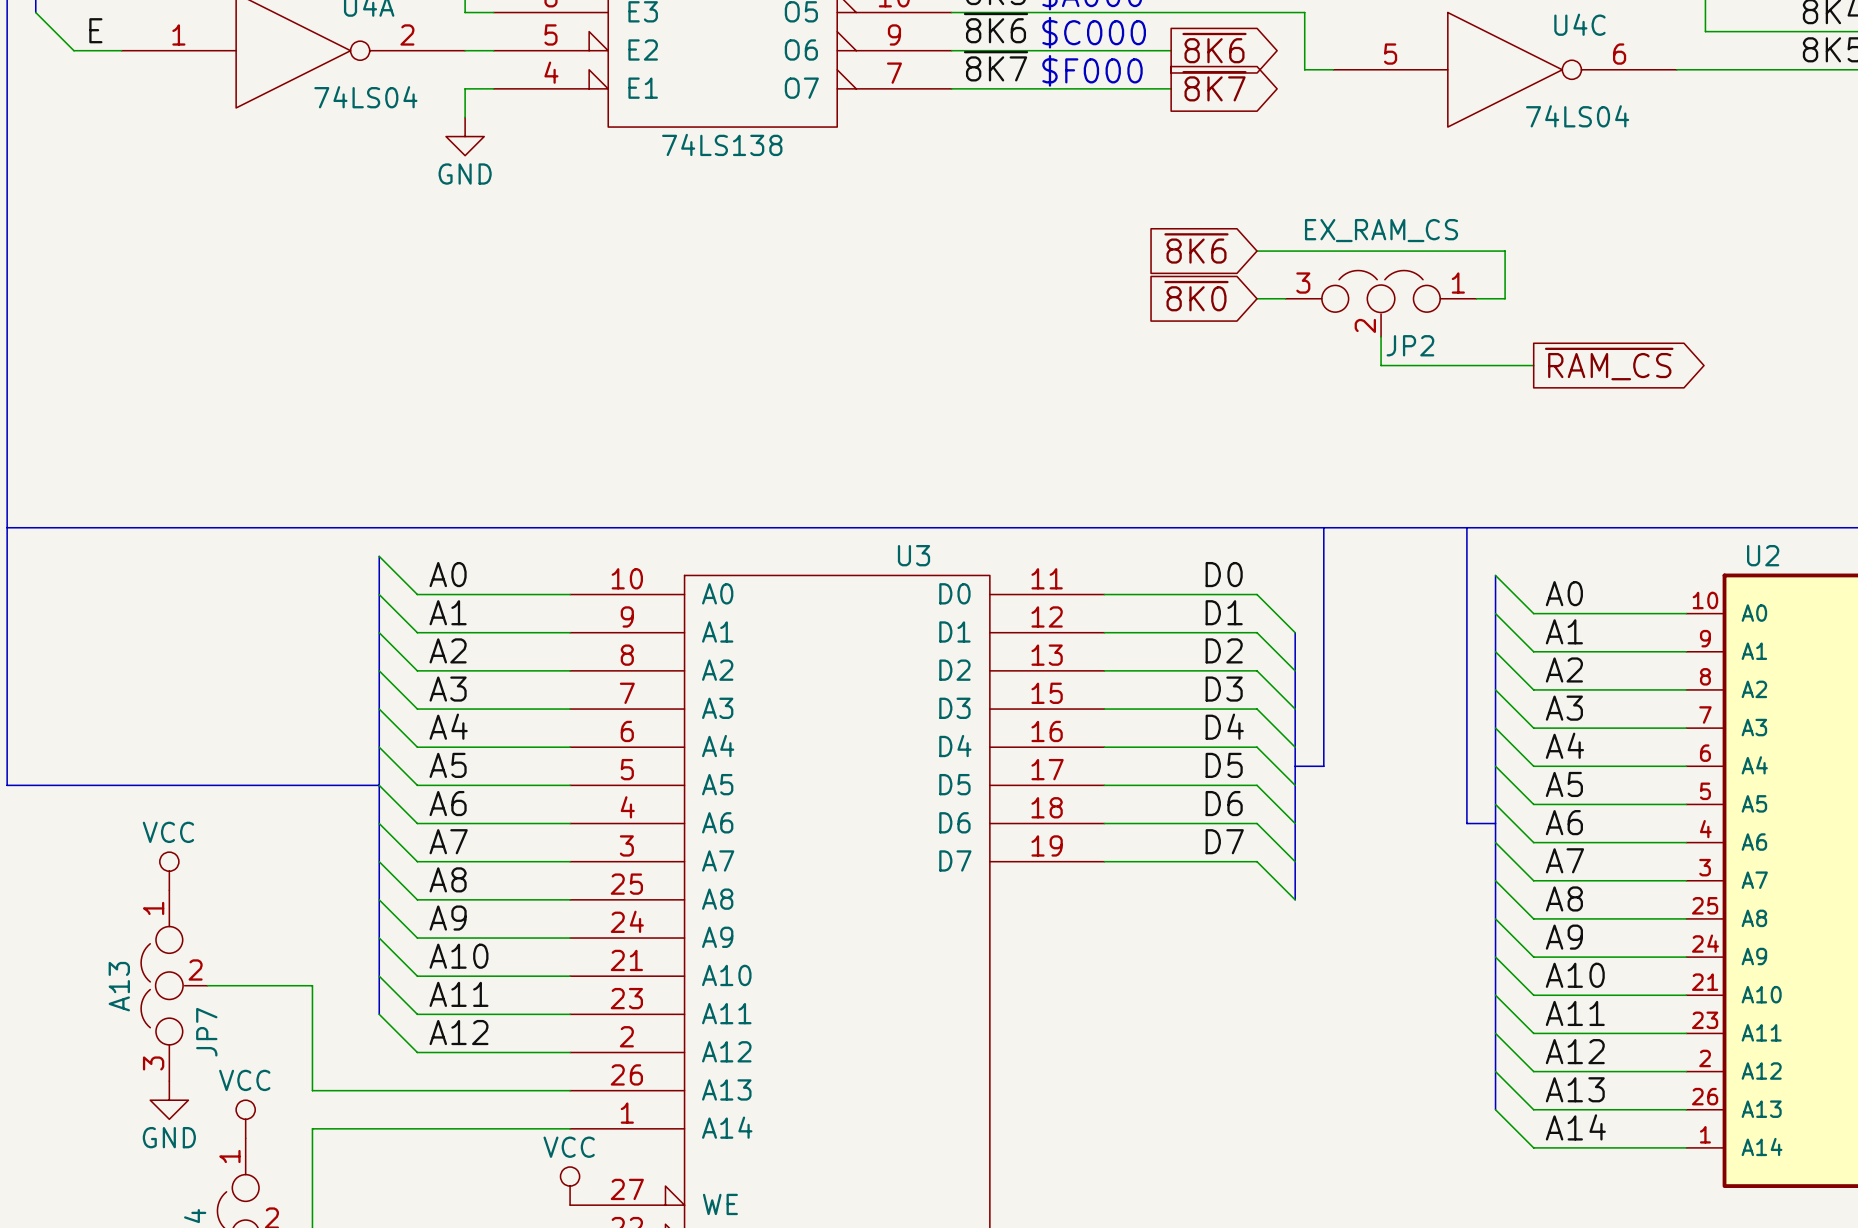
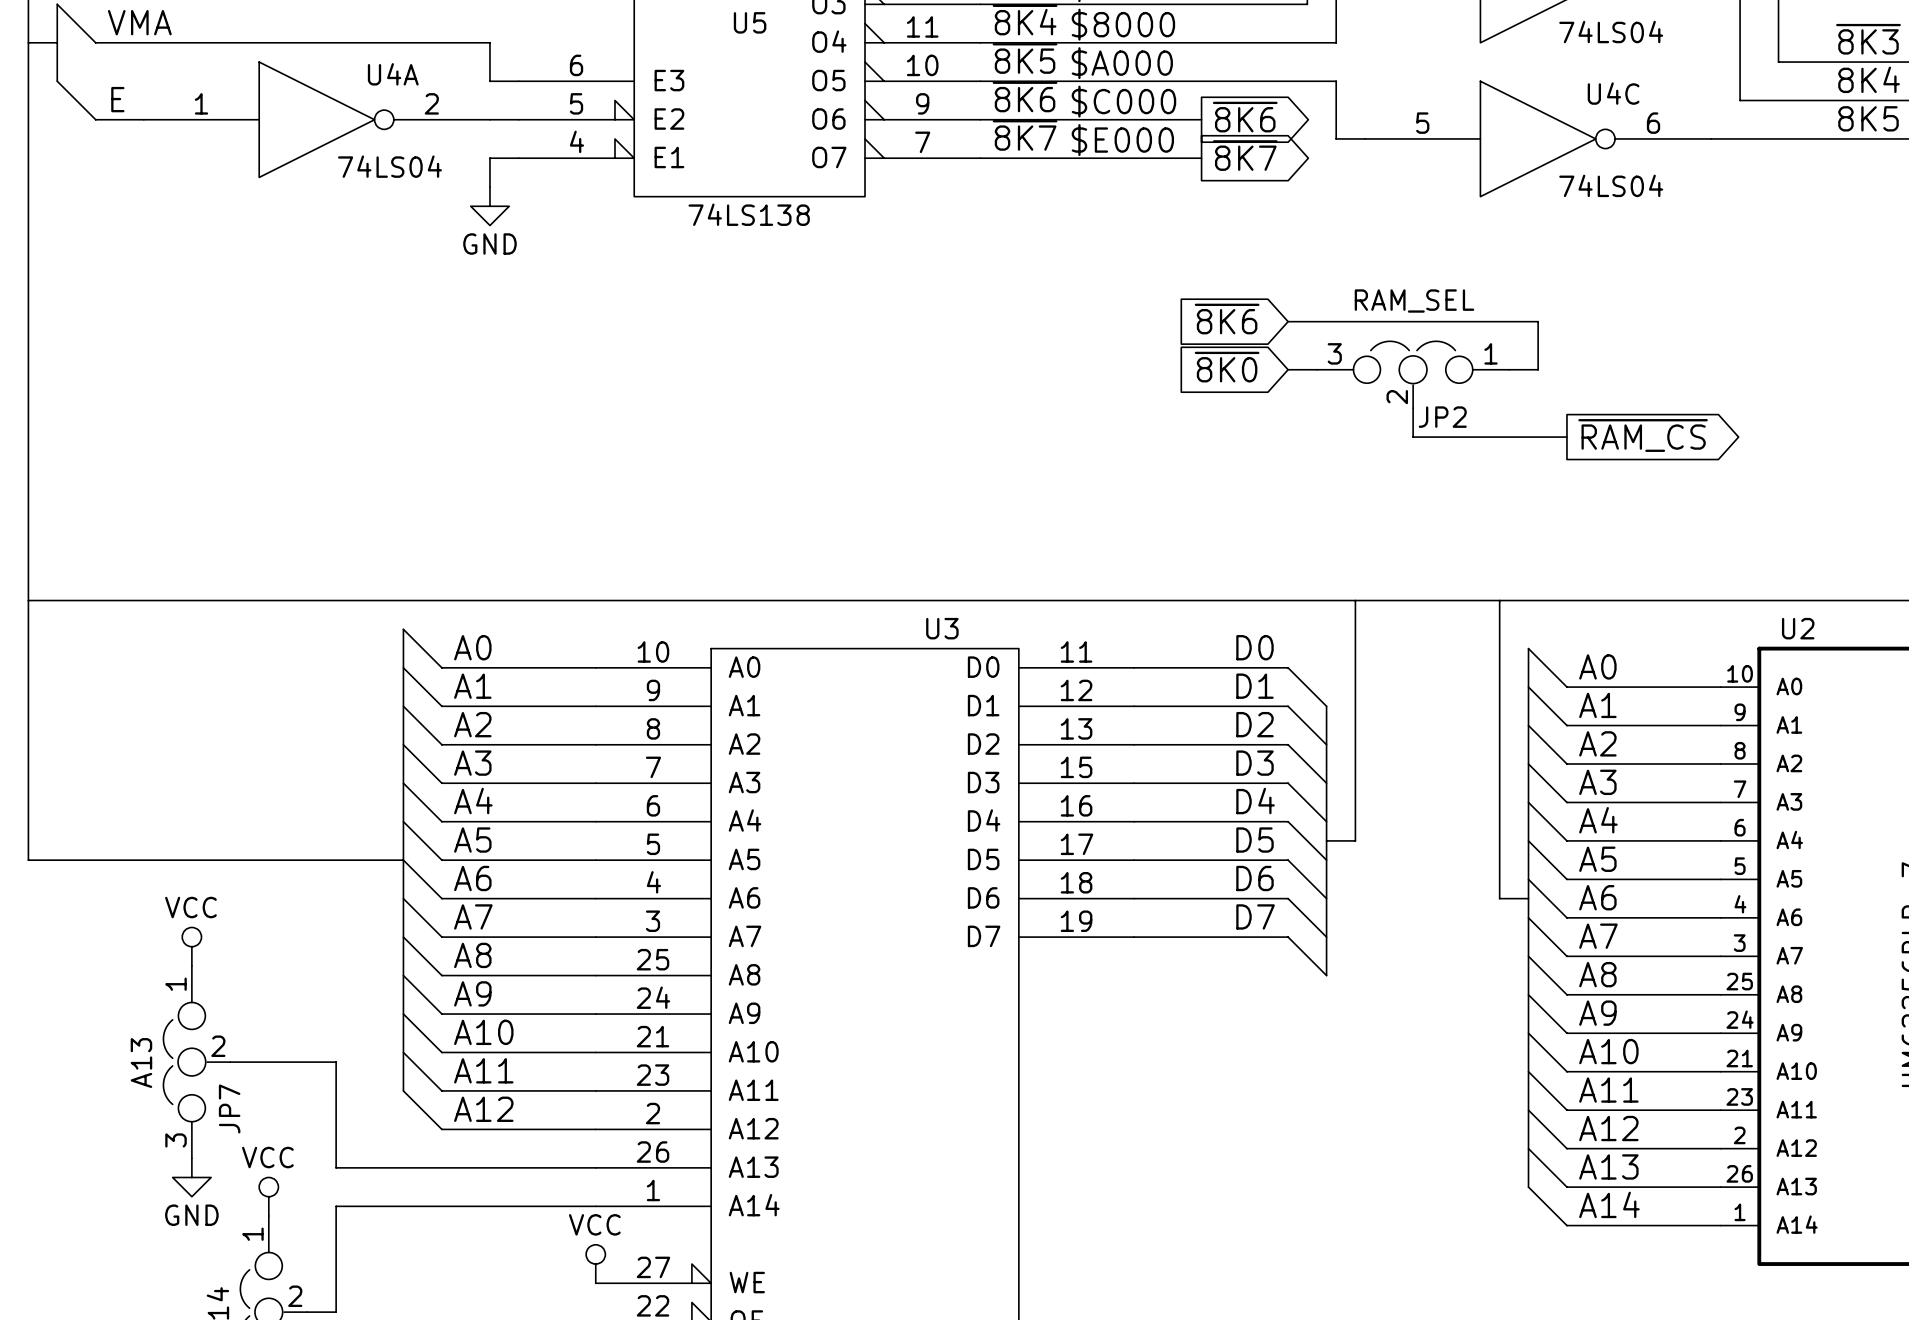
text: $F000 (1092, 70) -> $E000 (1122, 140)
JP2 value: EX_RAM_CS (1381, 230) -> RAM_SEL (1414, 301)

